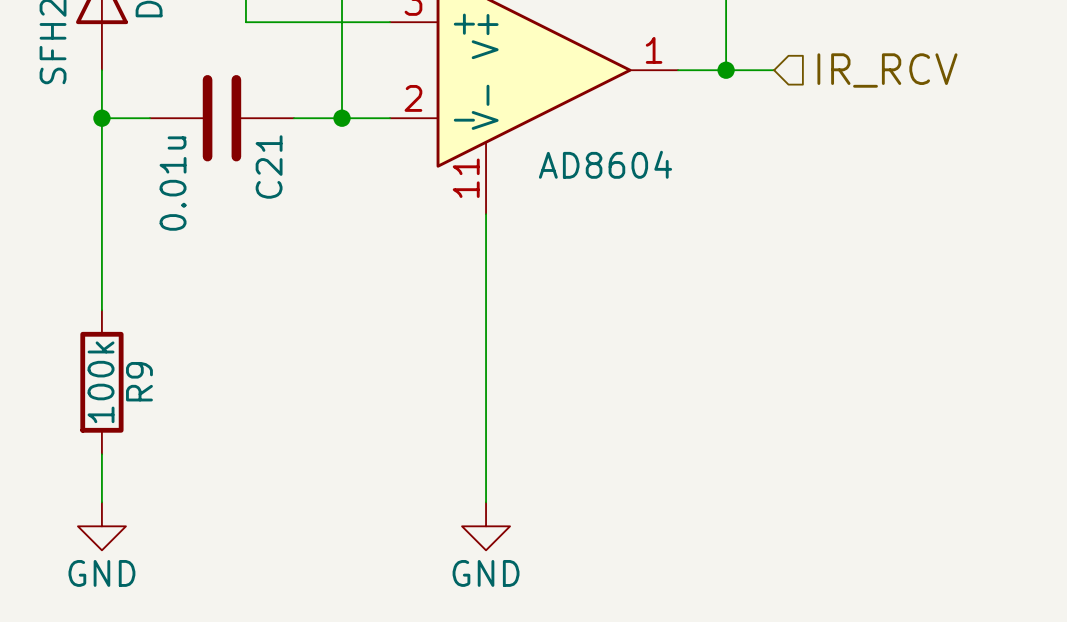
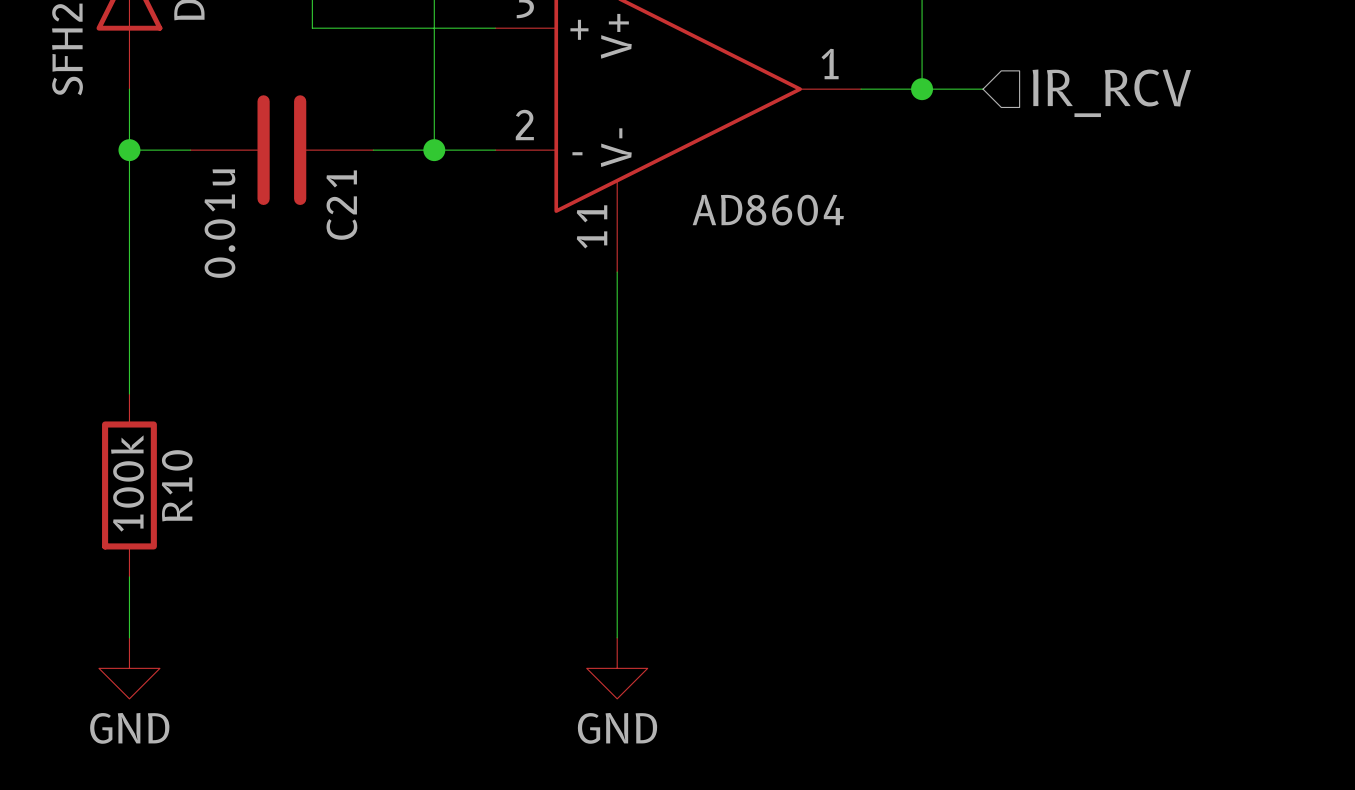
R9 name: R9 (139, 381) -> R10 (177, 485)

